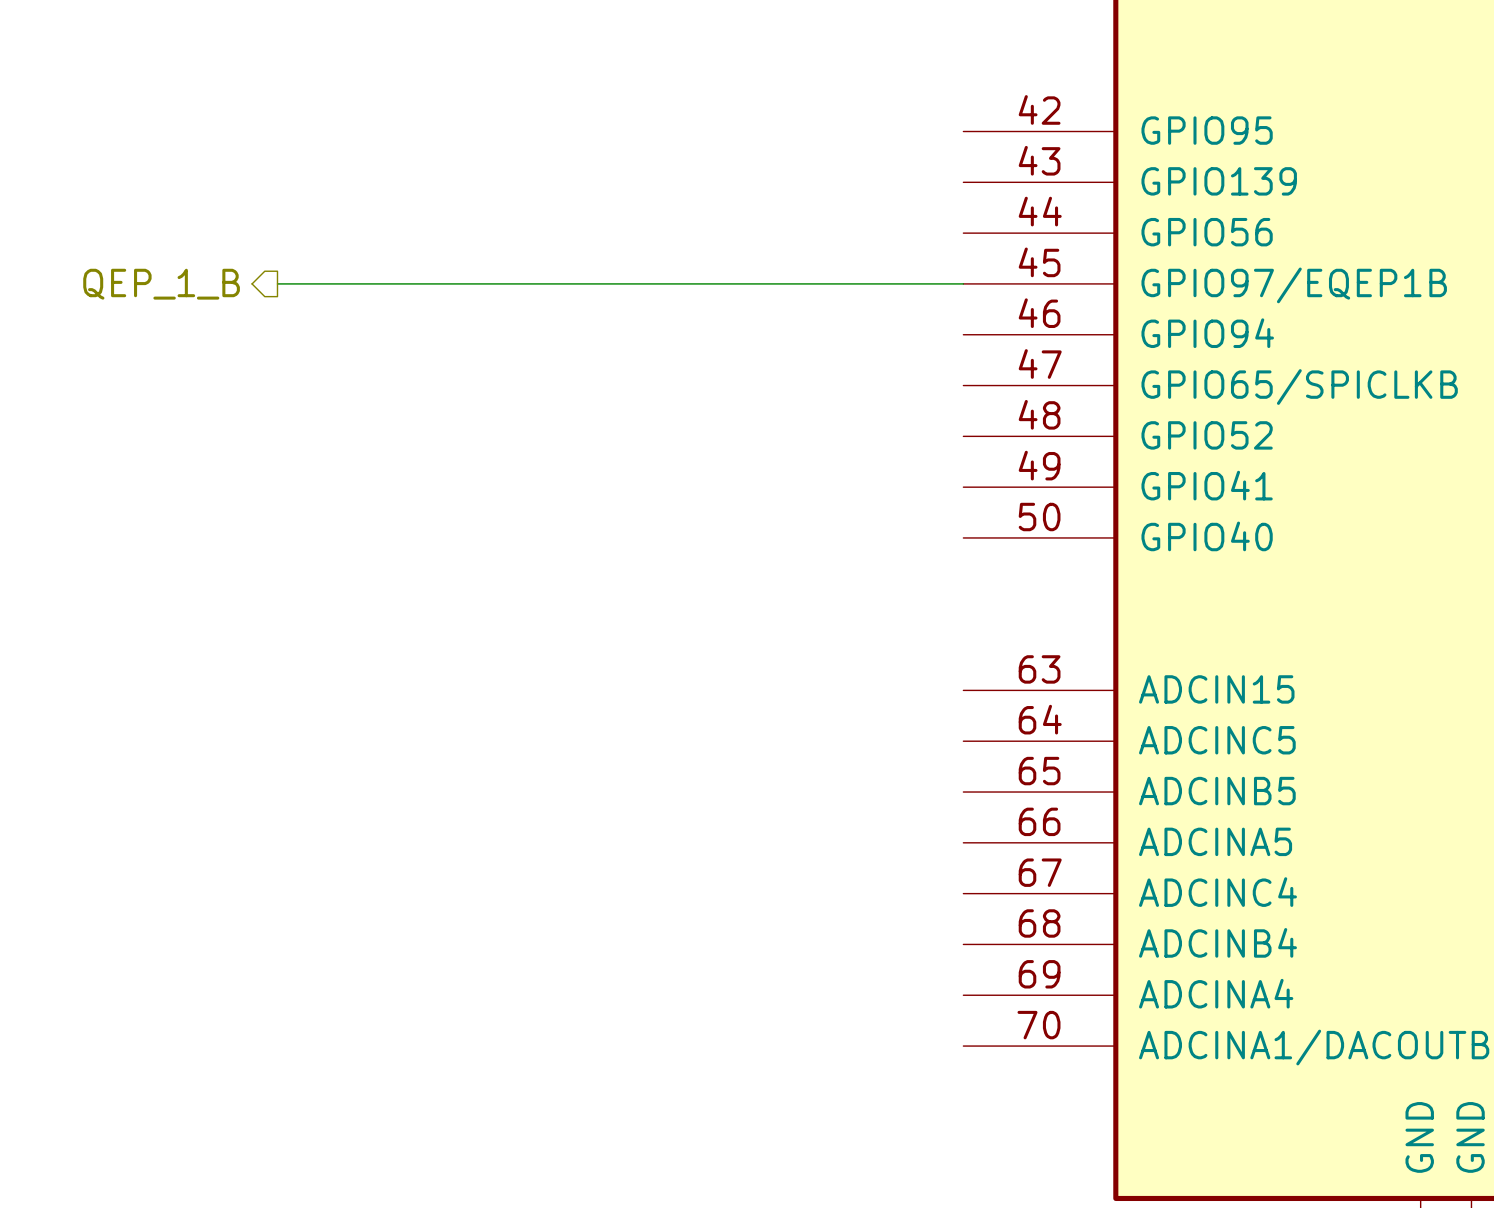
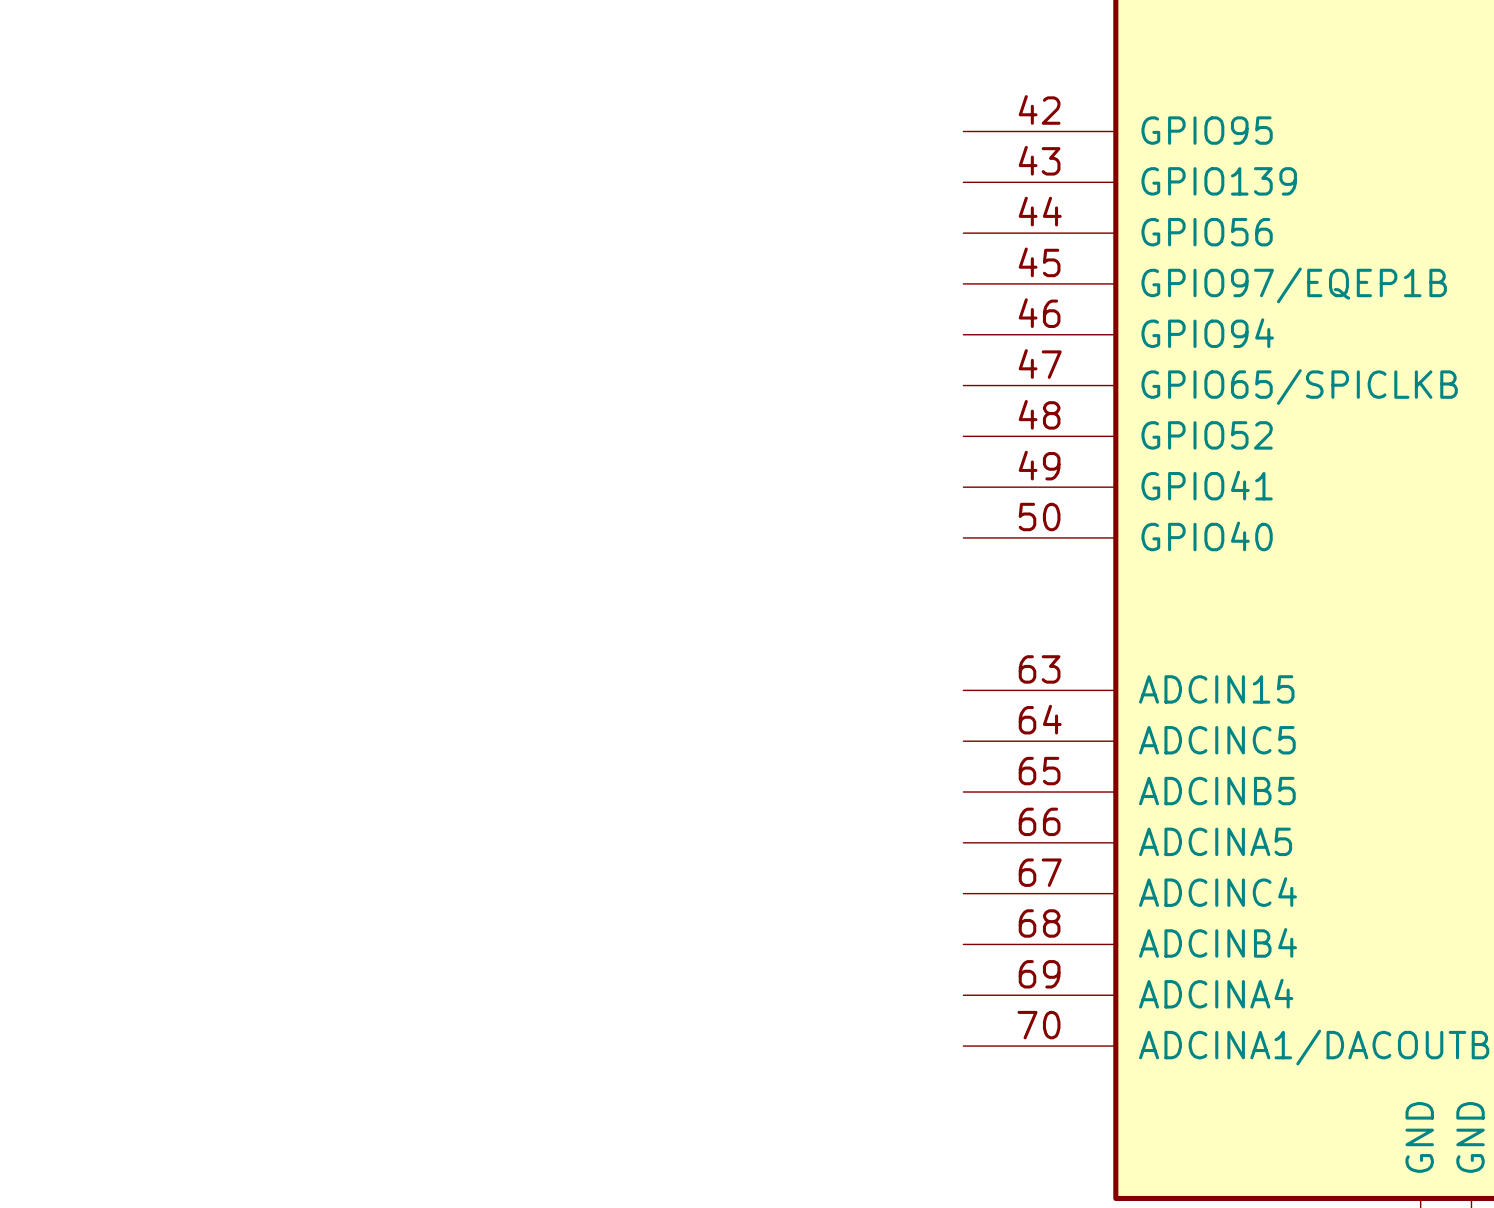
wire: (277, 283) (963, 283) -> none
hierarchical label: QEP_1_B (161, 284) -> none

